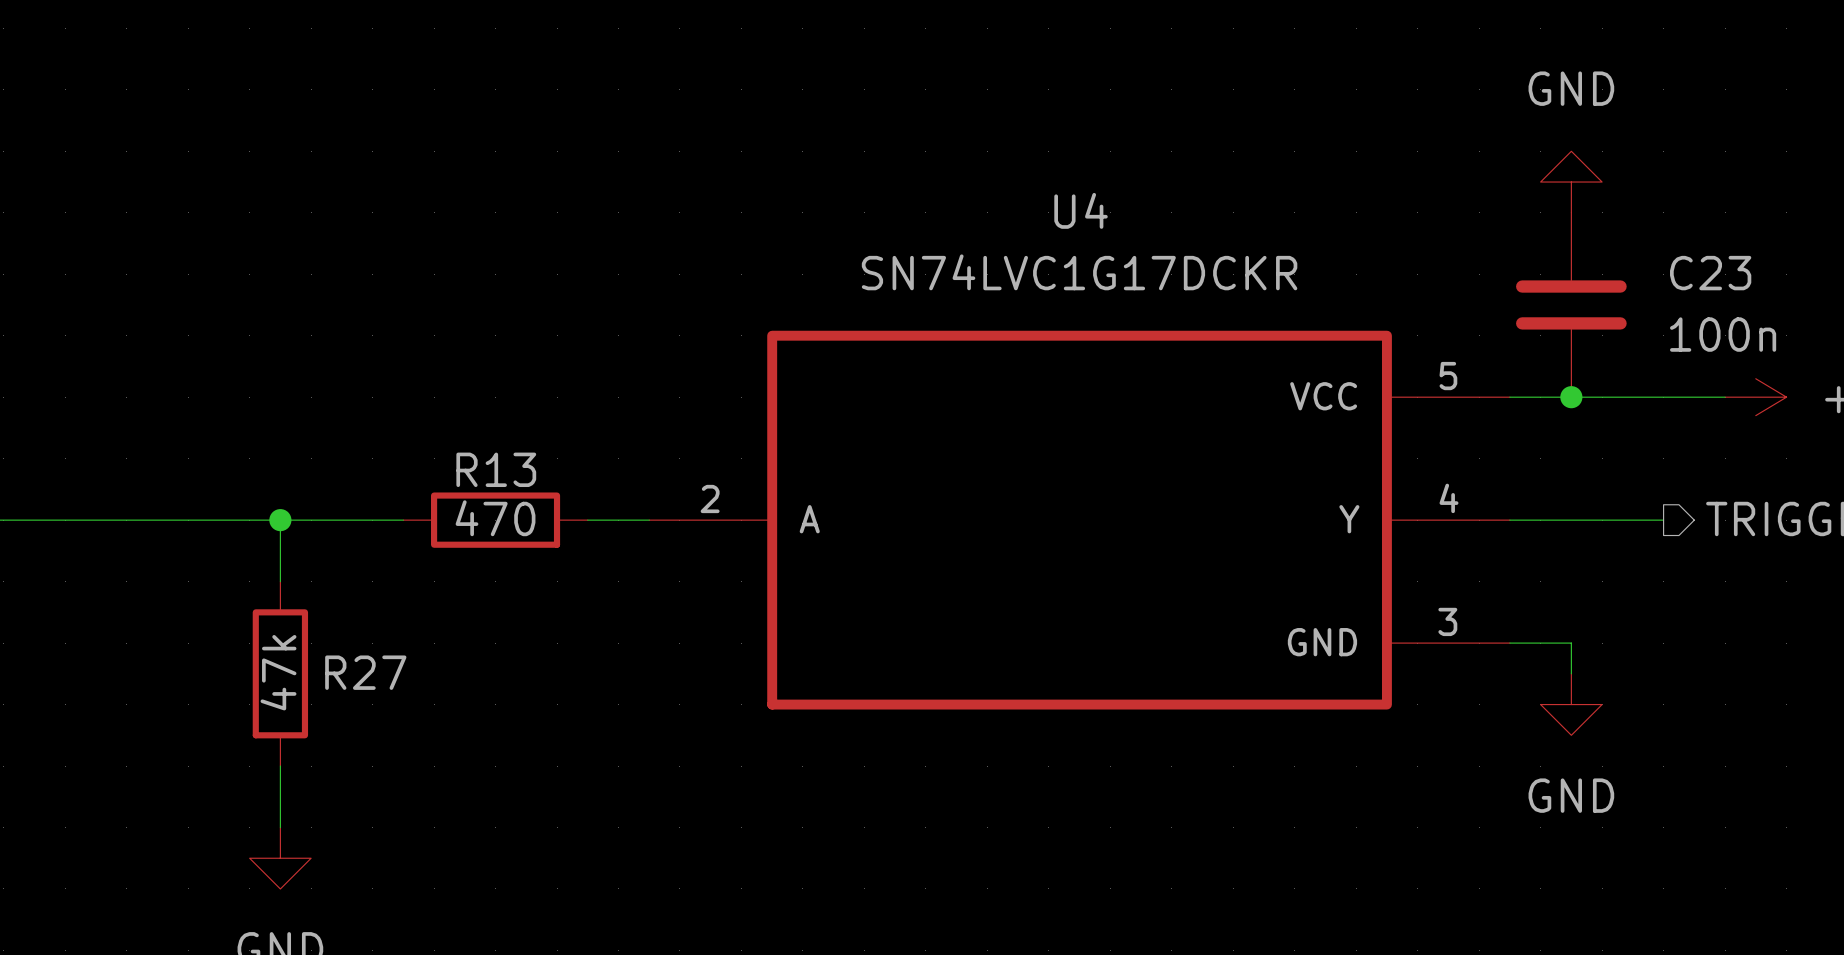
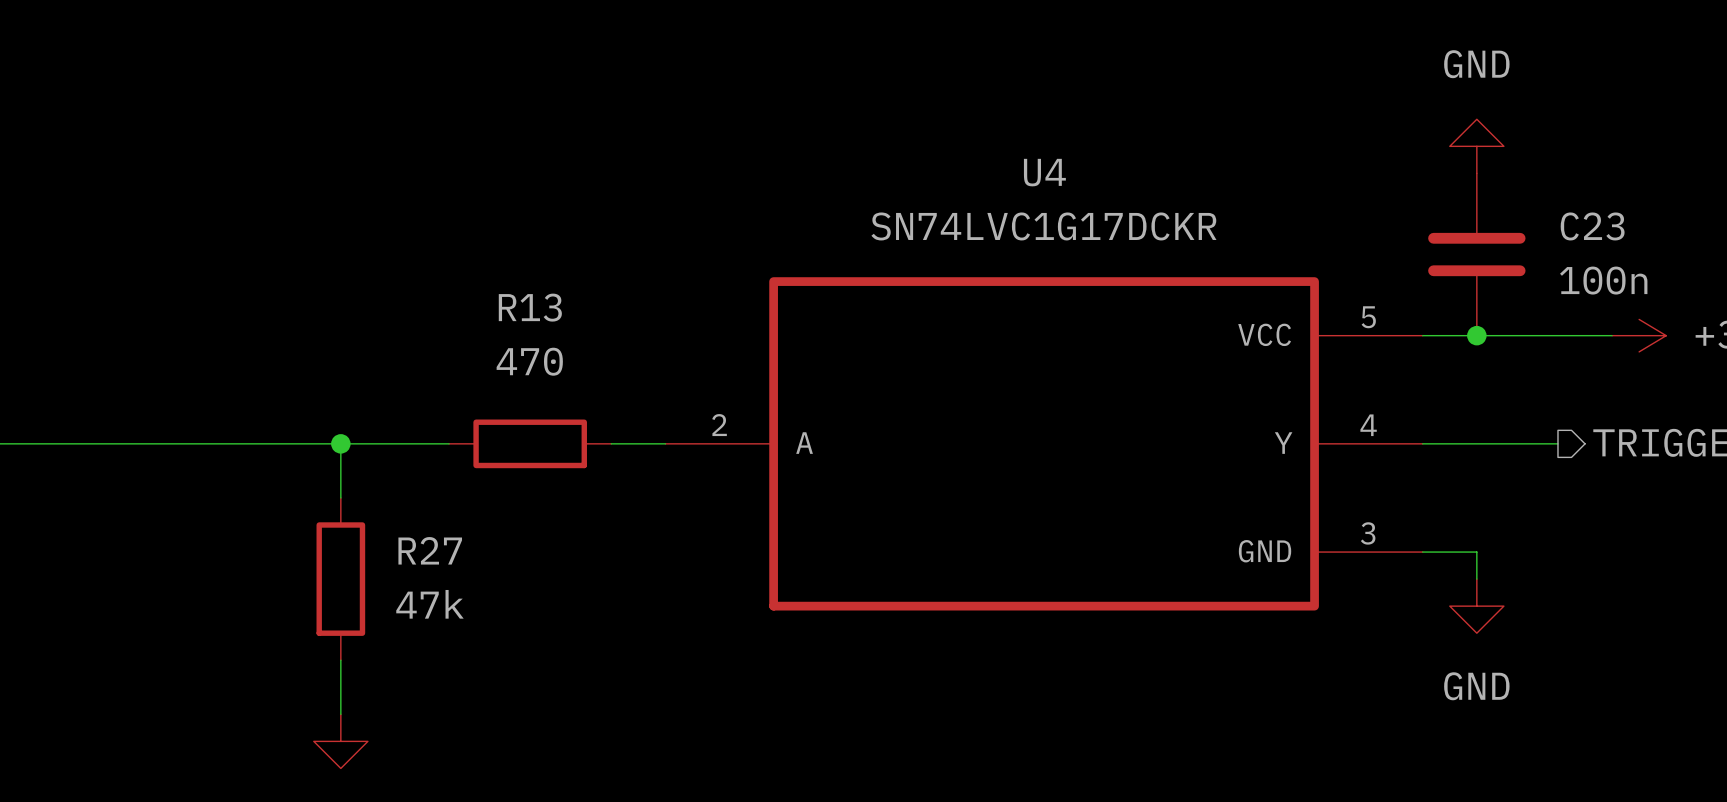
R13 name position: R13 (496, 469) -> R13 (530, 307)
R13 value position: 470 (495, 518) -> 470 (529, 361)
R27 value rotation: 0° (278, 672) -> 90° clockwise (429, 604)
R27 value position: 47k (278, 672) -> 47k (429, 604)
R27 name position: R27 (365, 672) -> R27 (430, 550)

